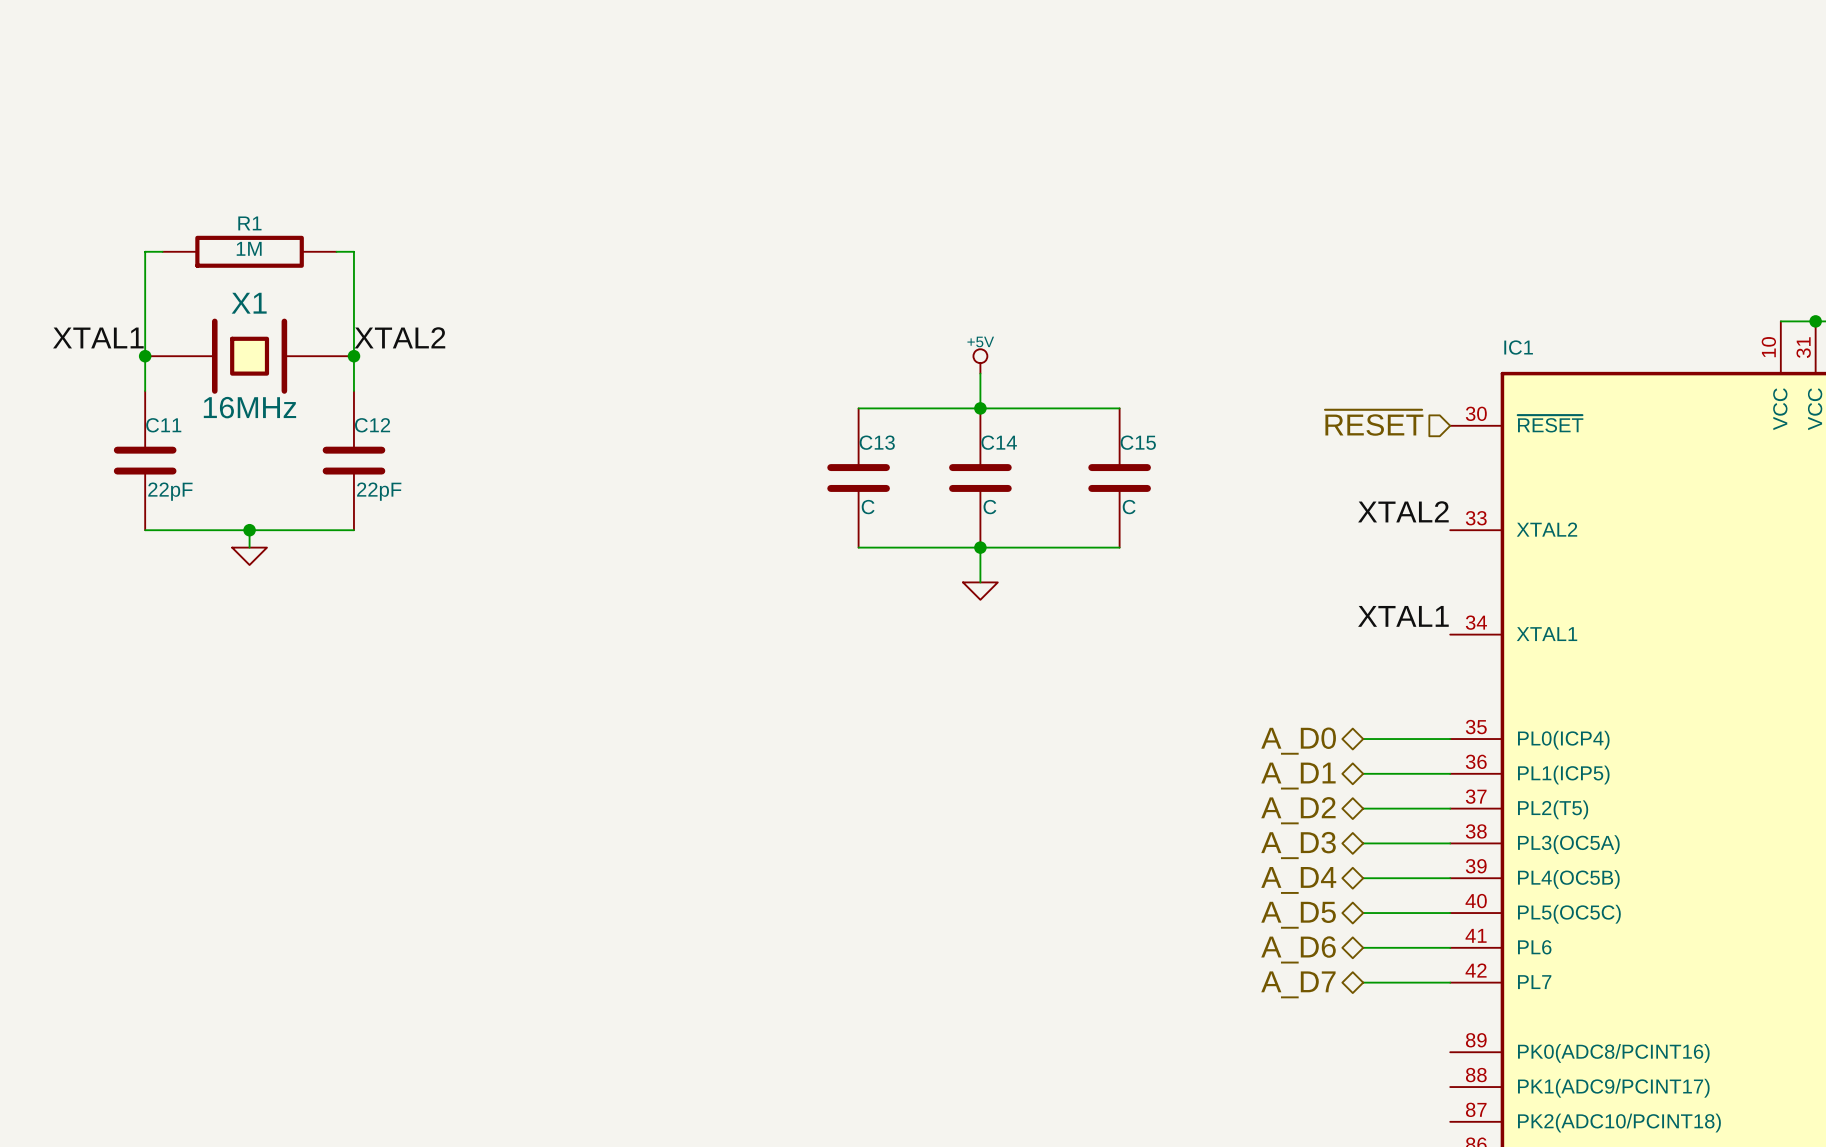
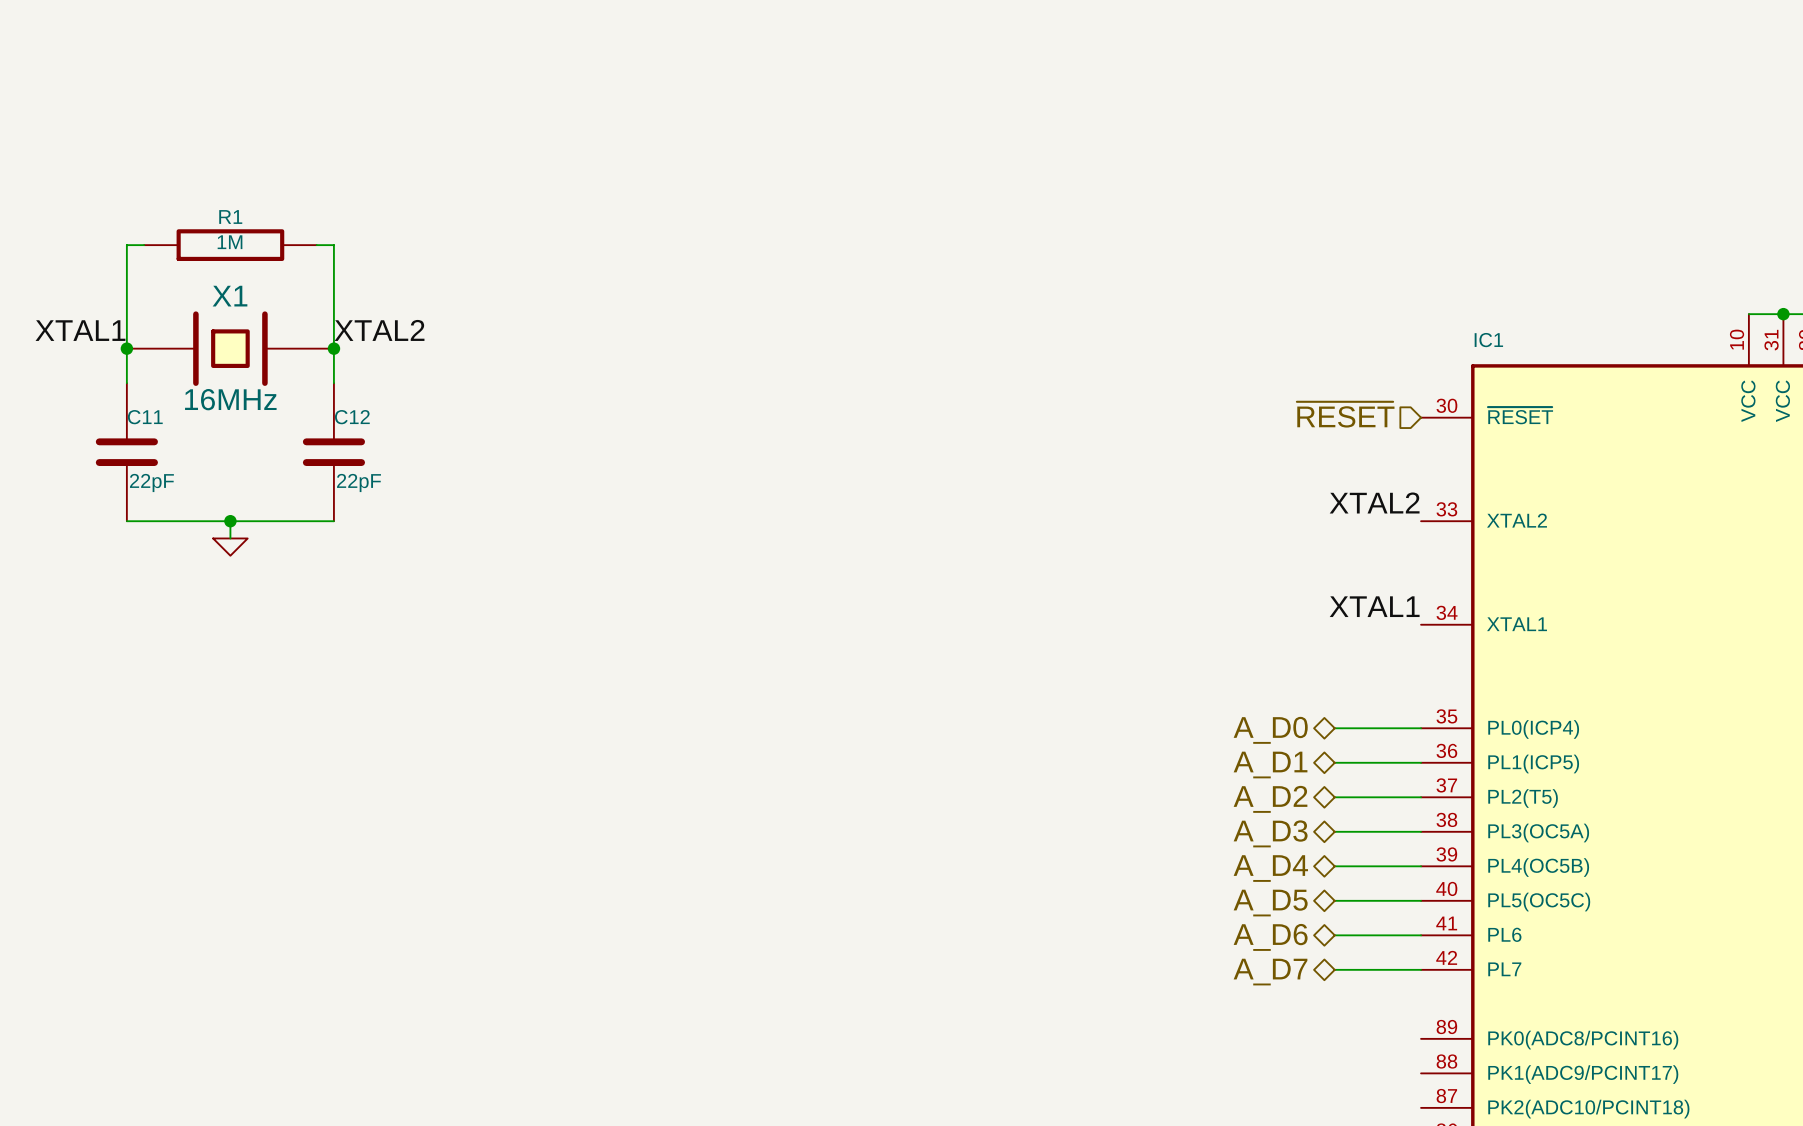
power symbol: +5V (980, 361) -> none
wire: (980, 373) (980, 408) -> none
wire: (858, 408) (1119, 408) -> none
junction: (980, 408) -> none
C13: C (858, 478) -> none
C14: C (980, 478) -> none
C15: C (1119, 478) -> none
wire: (858, 547) (1119, 547) -> none
wire: (980, 547) (980, 582) -> none
junction: (980, 547) -> none
power symbol: (980, 591) -> none

